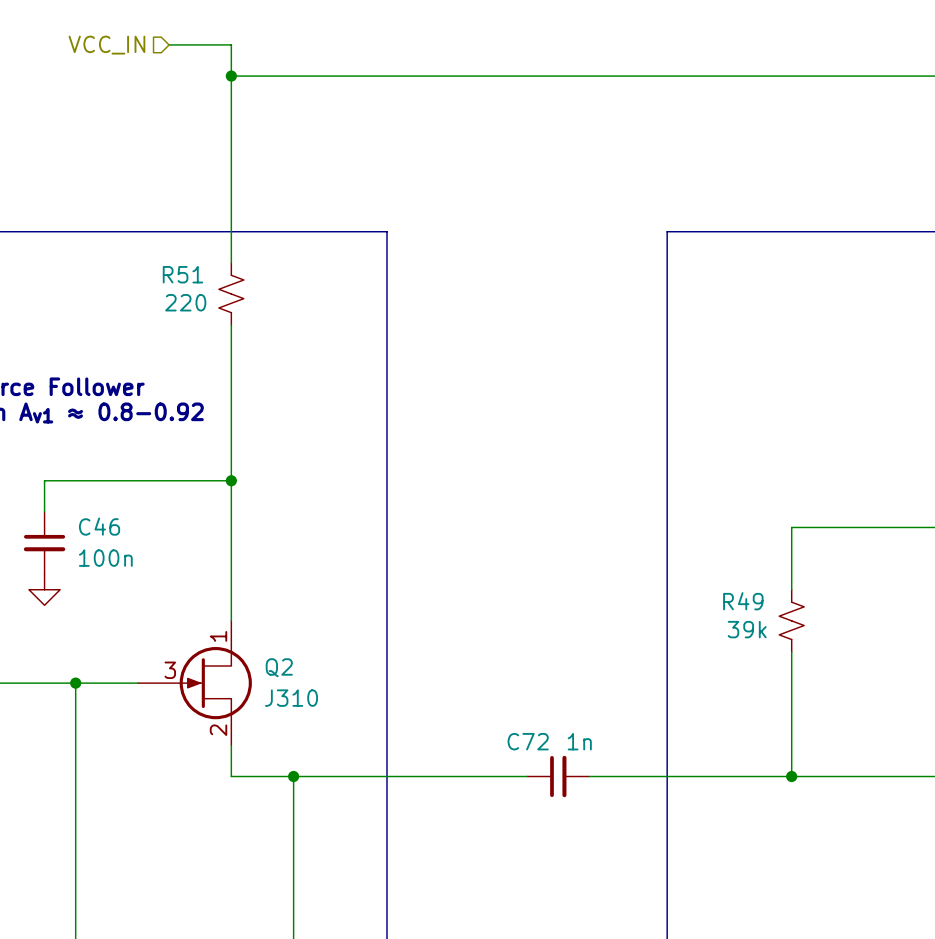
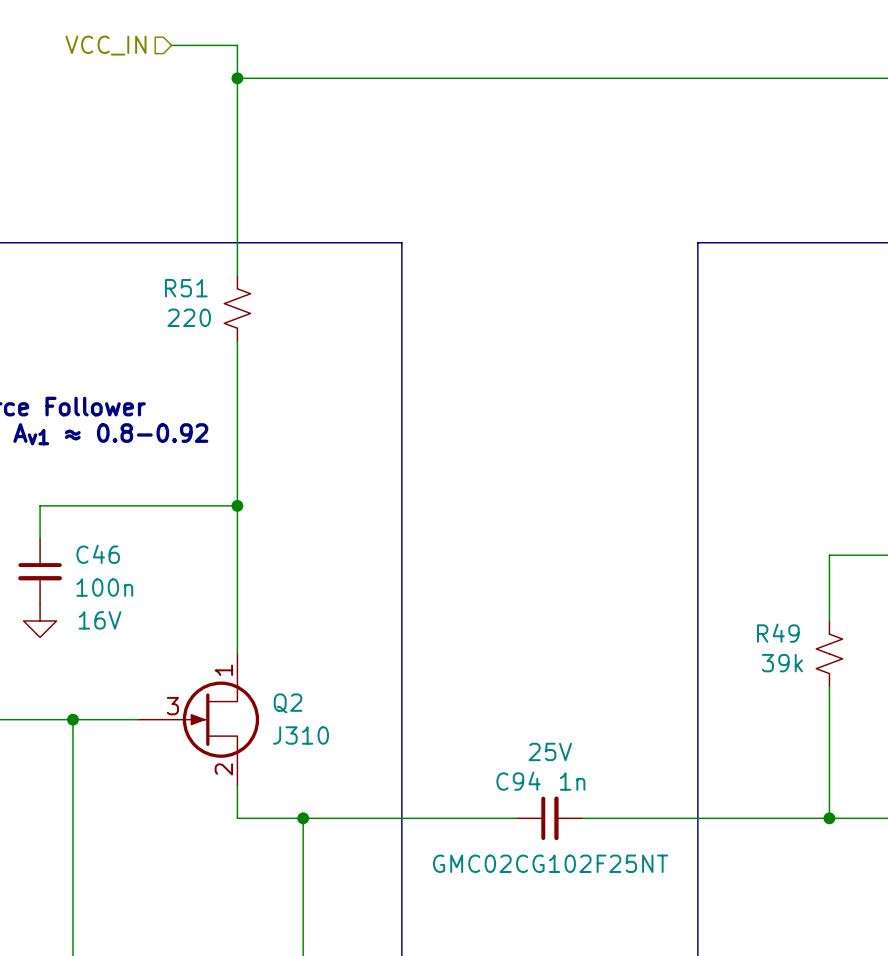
C46 text: none -> 16V (100, 620)
C94: none -> 1n (549, 818)
C72: 1n (558, 776) -> none

